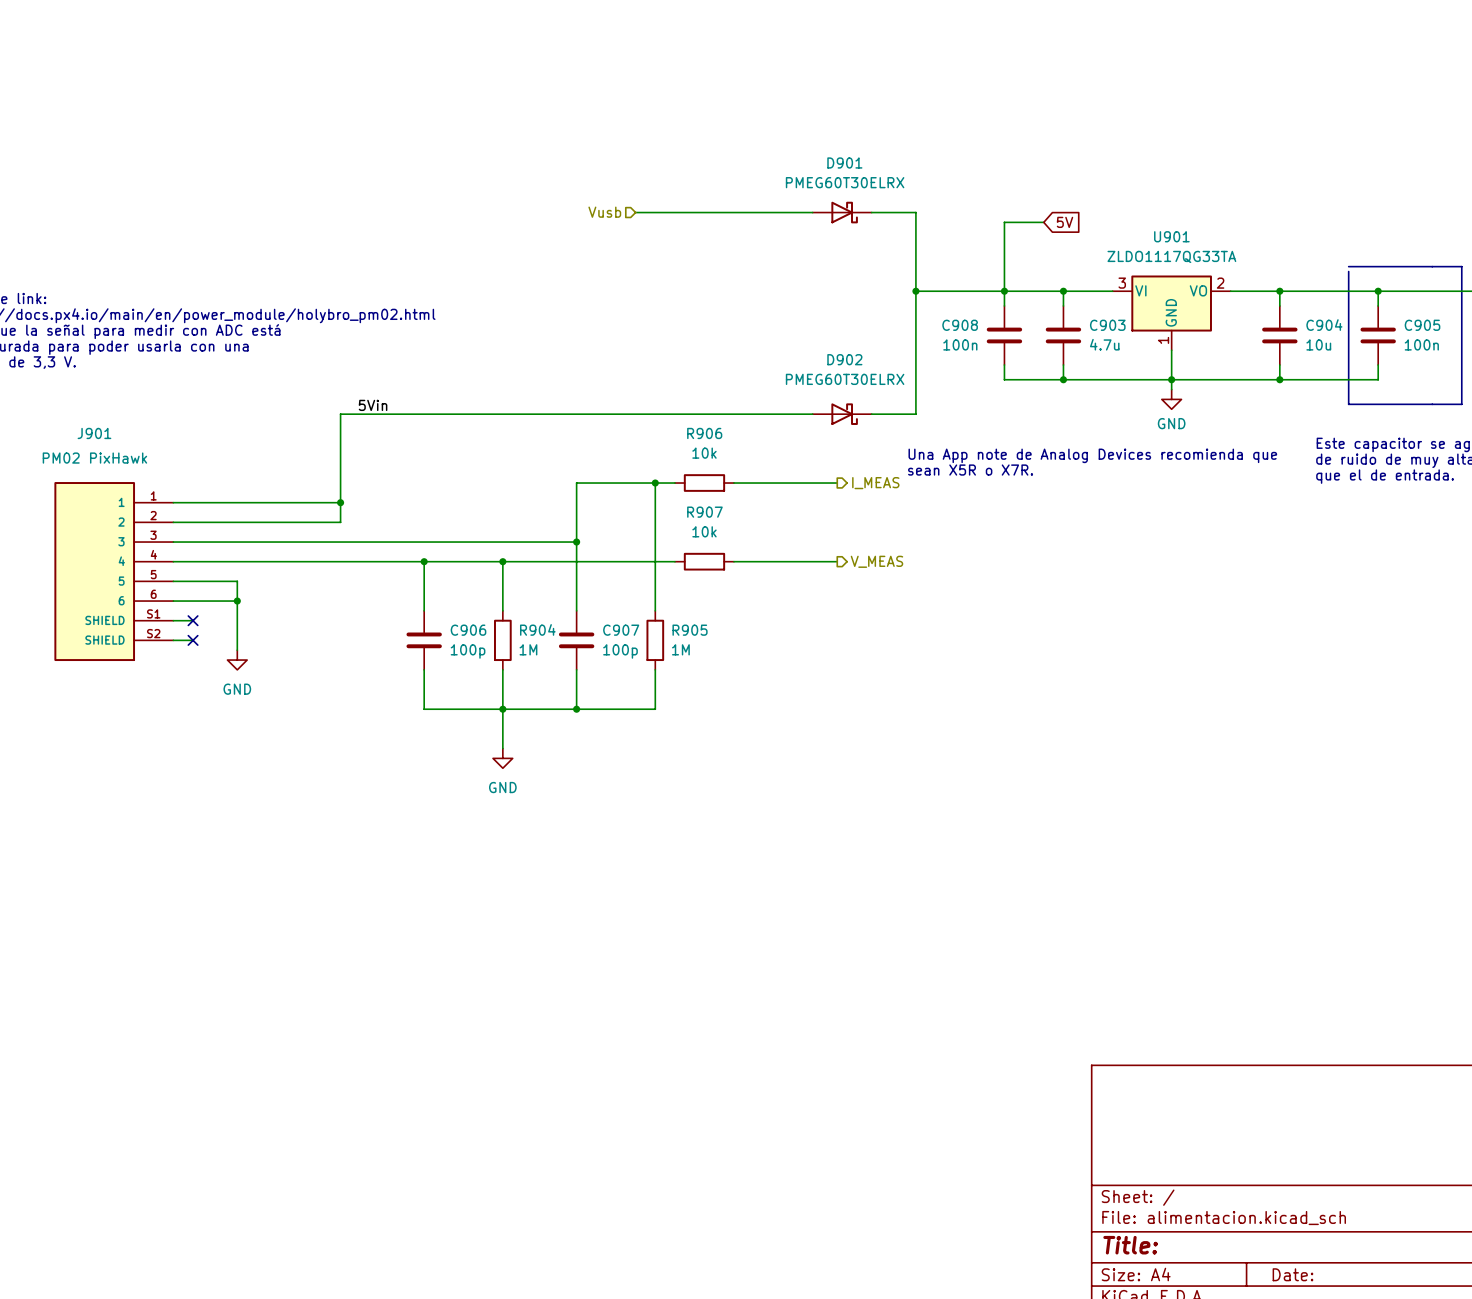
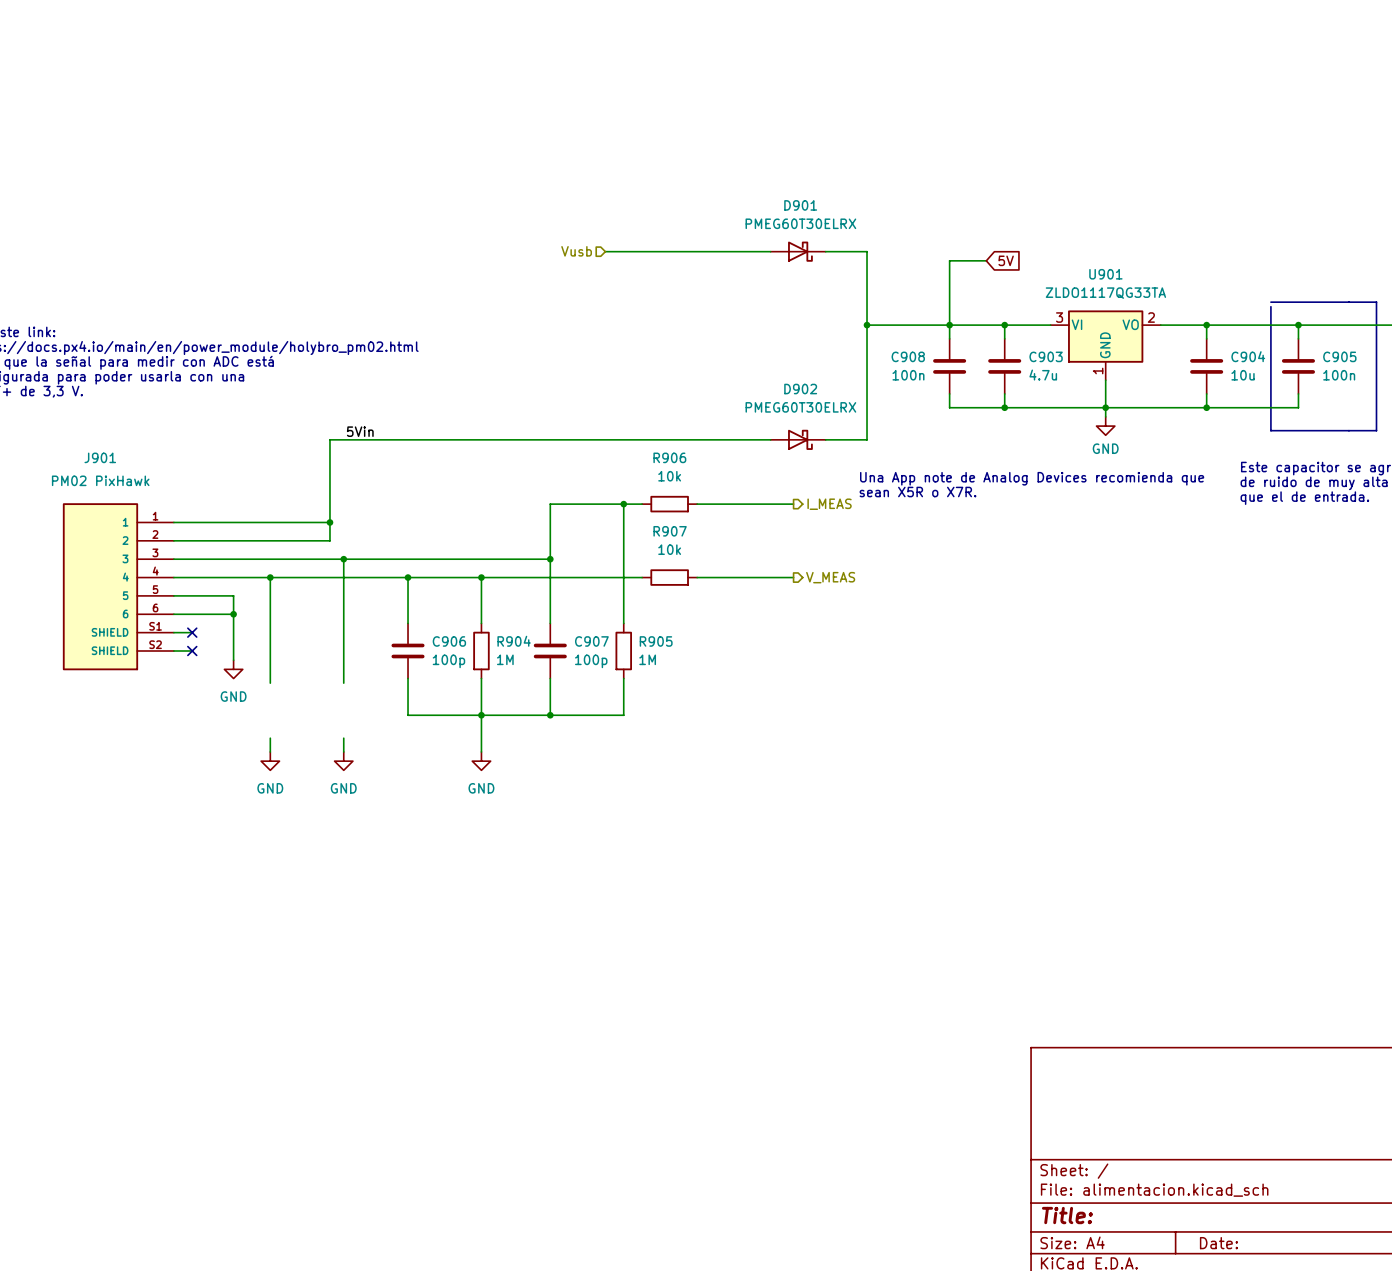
wire: none -> (343, 559) (343, 683)
junction: none -> (343, 559)
wire: none -> (270, 577) (270, 683)
junction: none -> (270, 577)
wire: none -> (270, 738) (270, 751)
wire: none -> (343, 738) (343, 751)
power symbol: none -> GND (270, 761)
power symbol: none -> GND (343, 761)

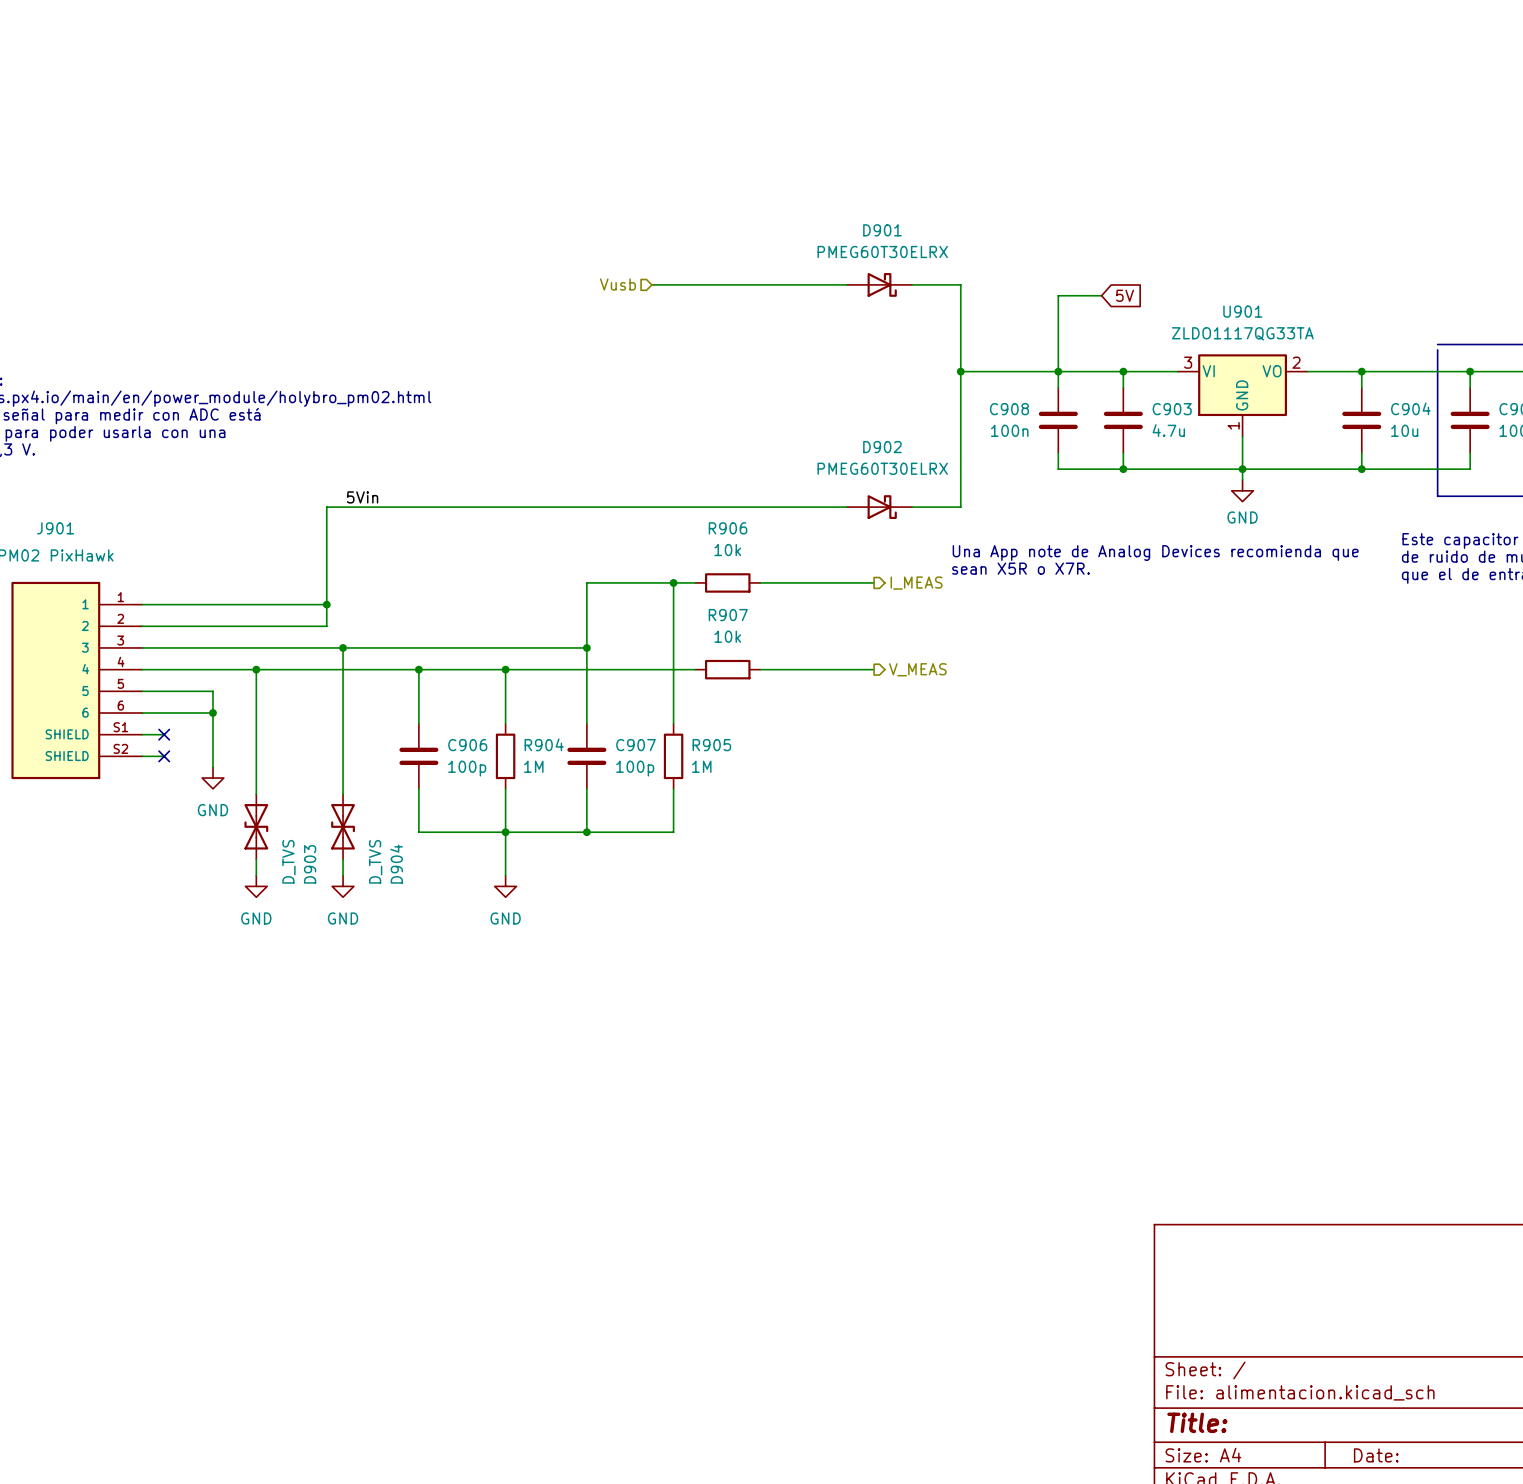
D903: none -> D_TVS (256, 826)
D904: none -> D_TVS (343, 826)

